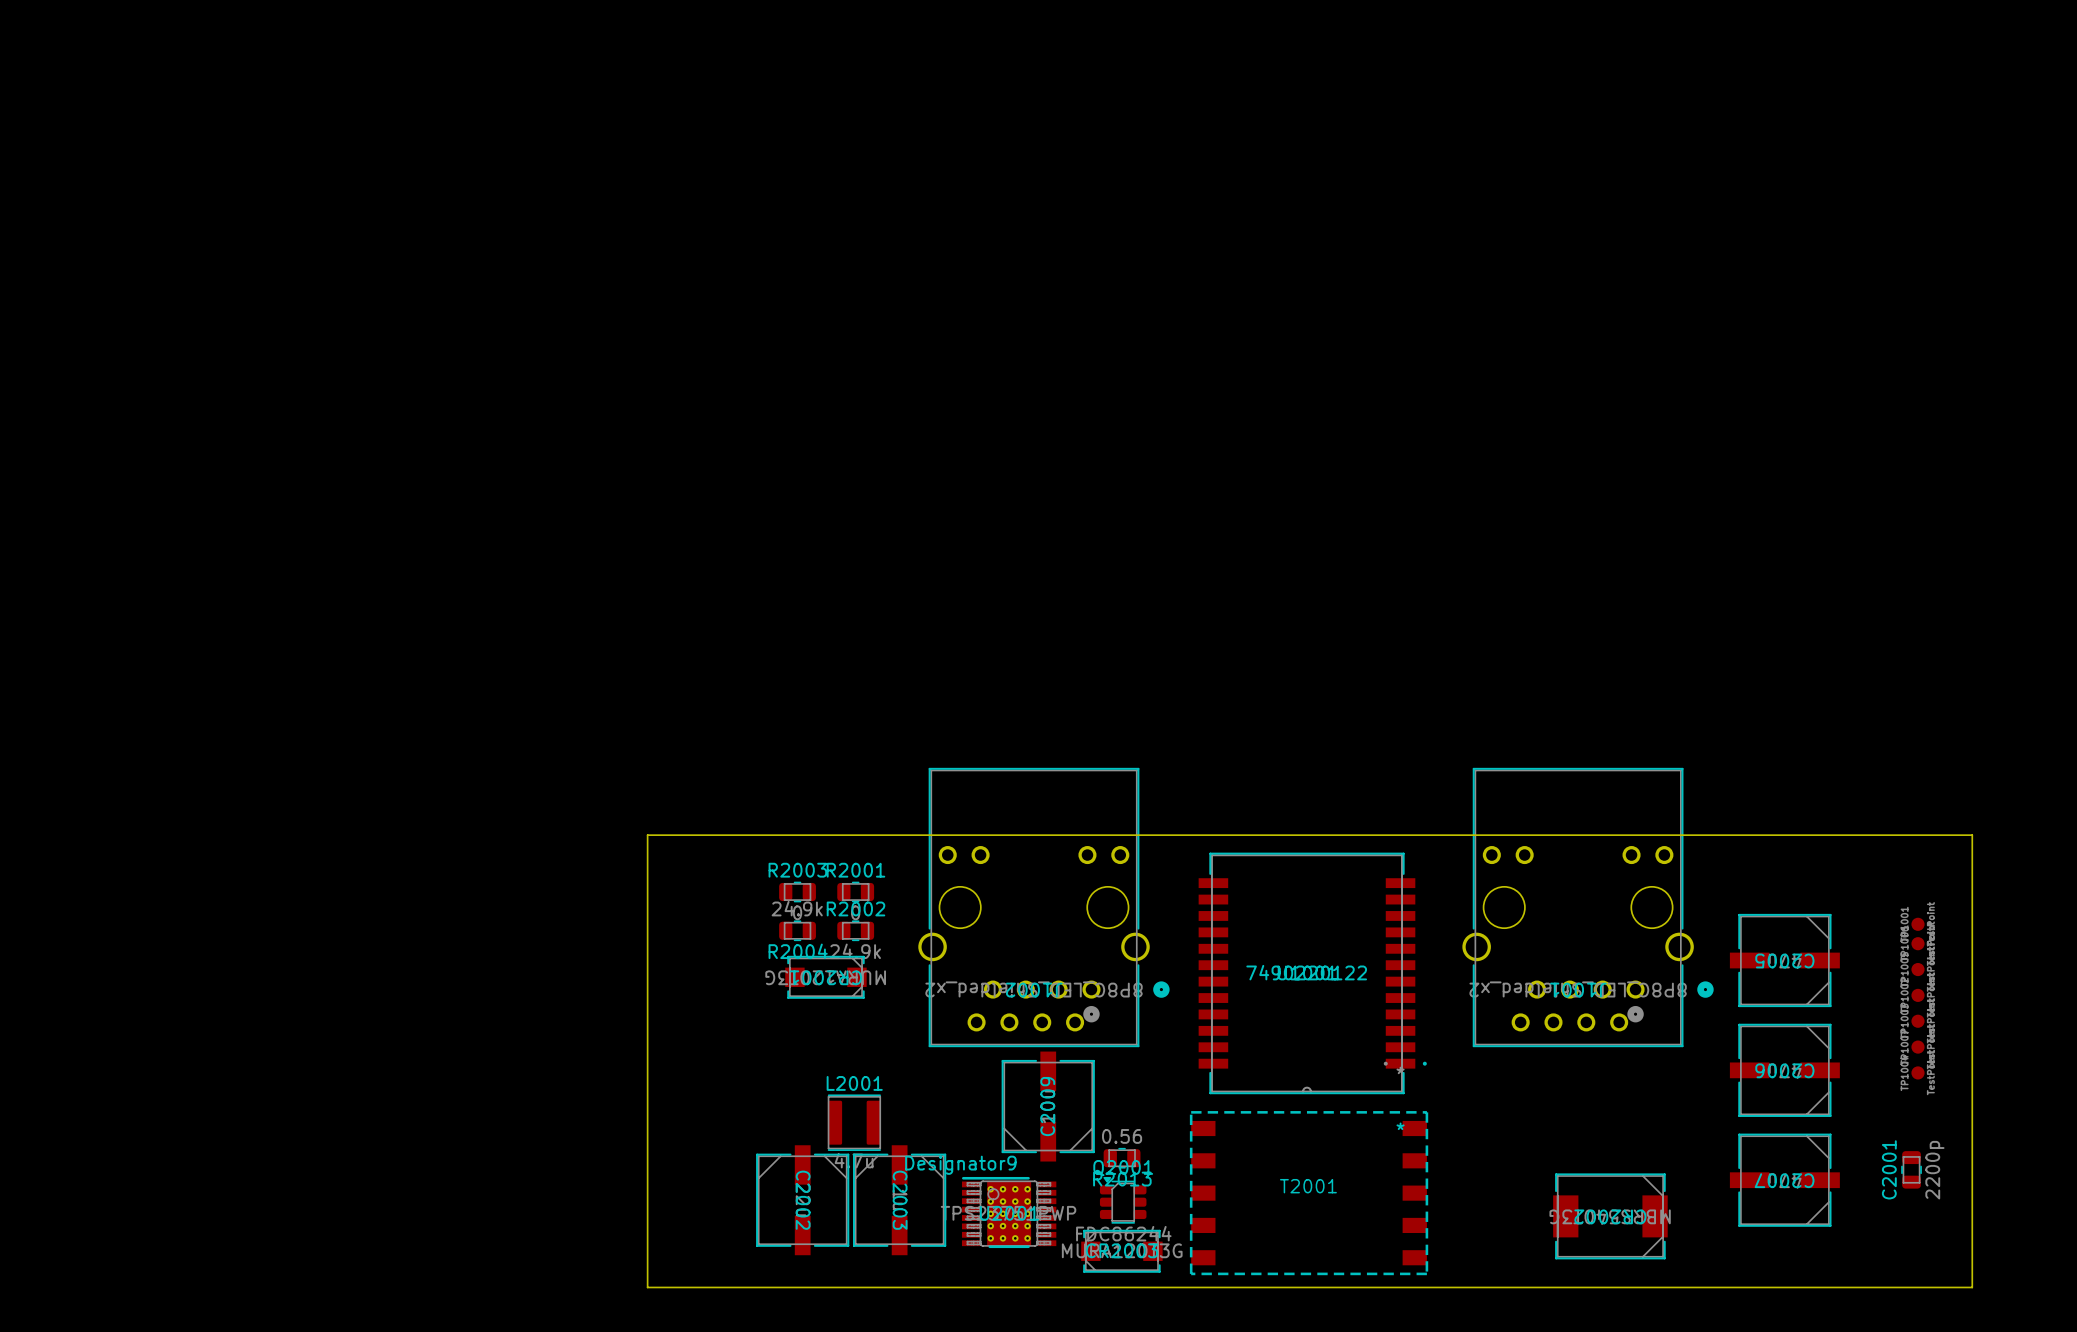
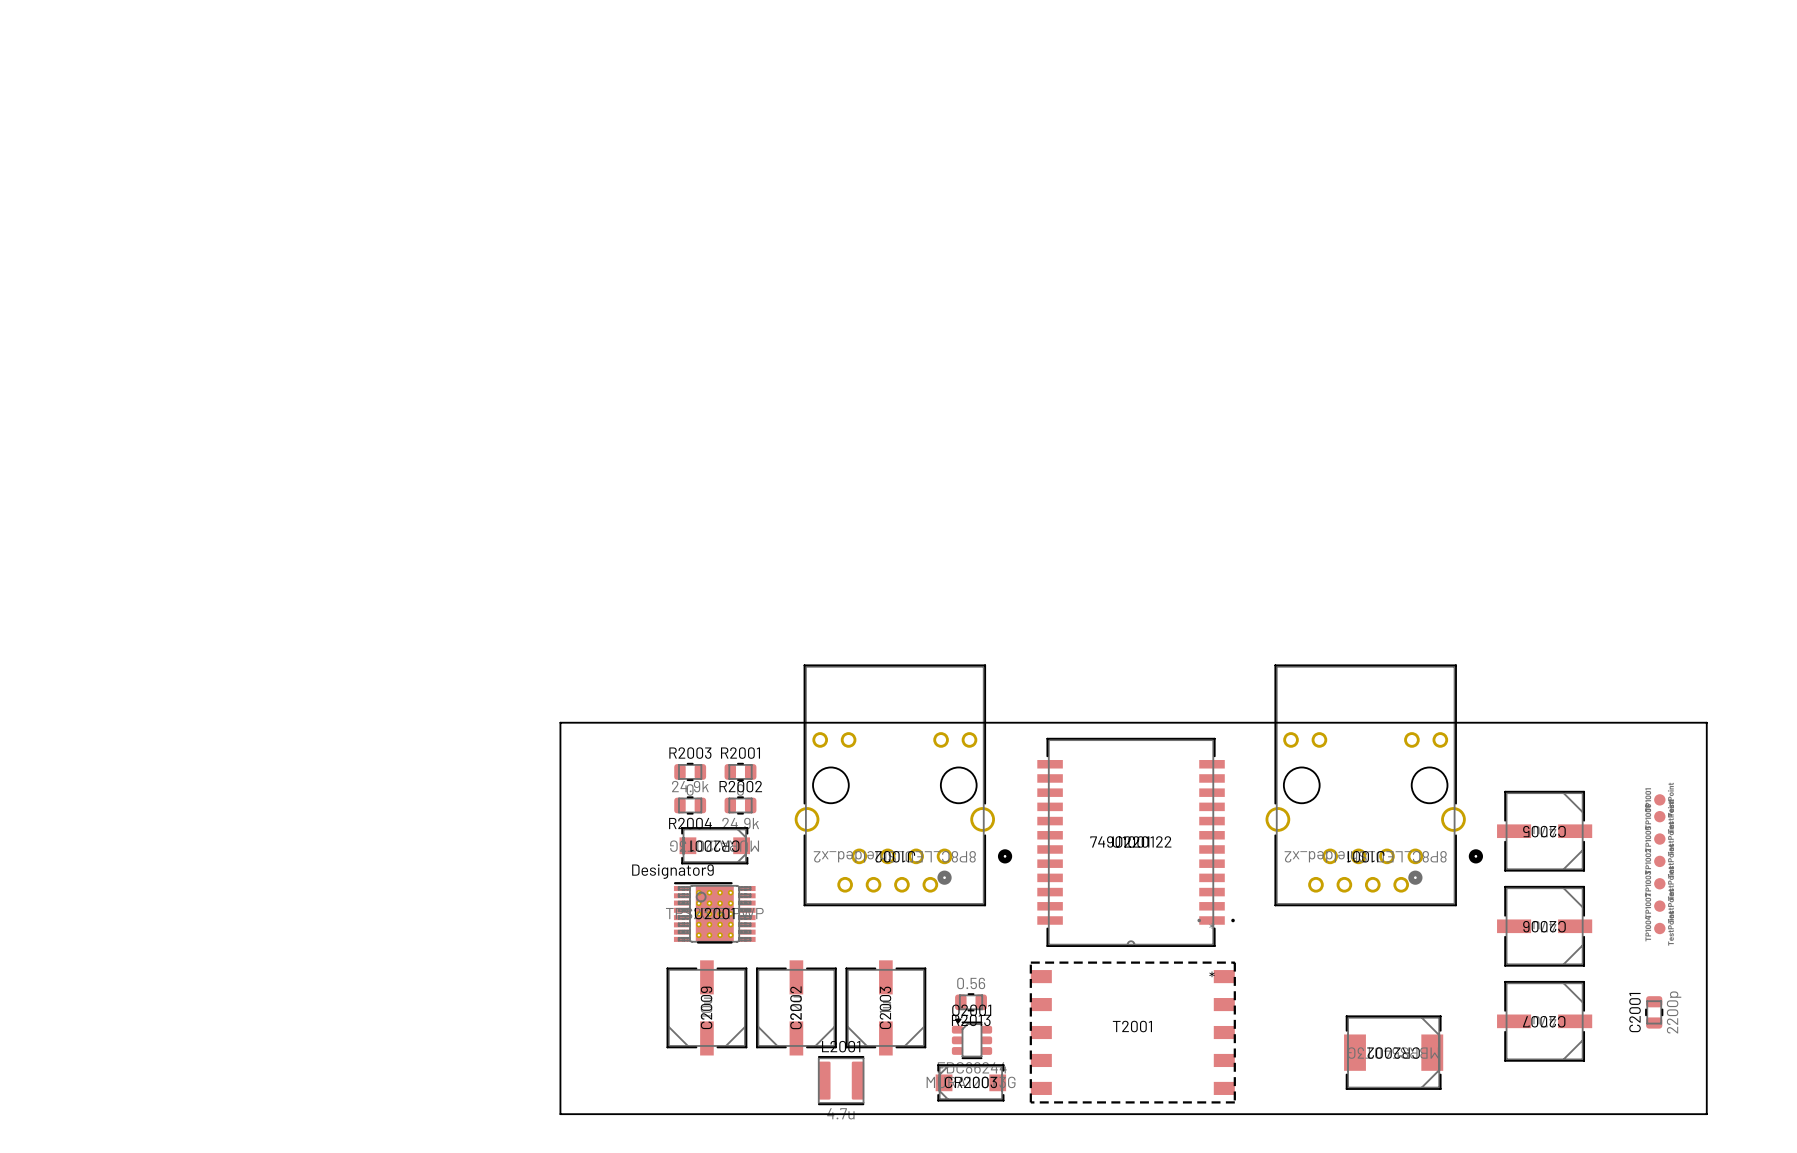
C2009 position: (1048, 1106) -> (706, 1007)
L2001 position: (854, 1122) -> (841, 1080)
C2002 rotation: 0° (802, 1200) -> 180° (796, 1007)
C2002 position: (802, 1200) -> (796, 1007)
C2003 rotation: 0° (899, 1200) -> 180° (885, 1007)
C2003 position: (899, 1200) -> (885, 1007)
U2001 position: (1009, 1212) -> (714, 912)

